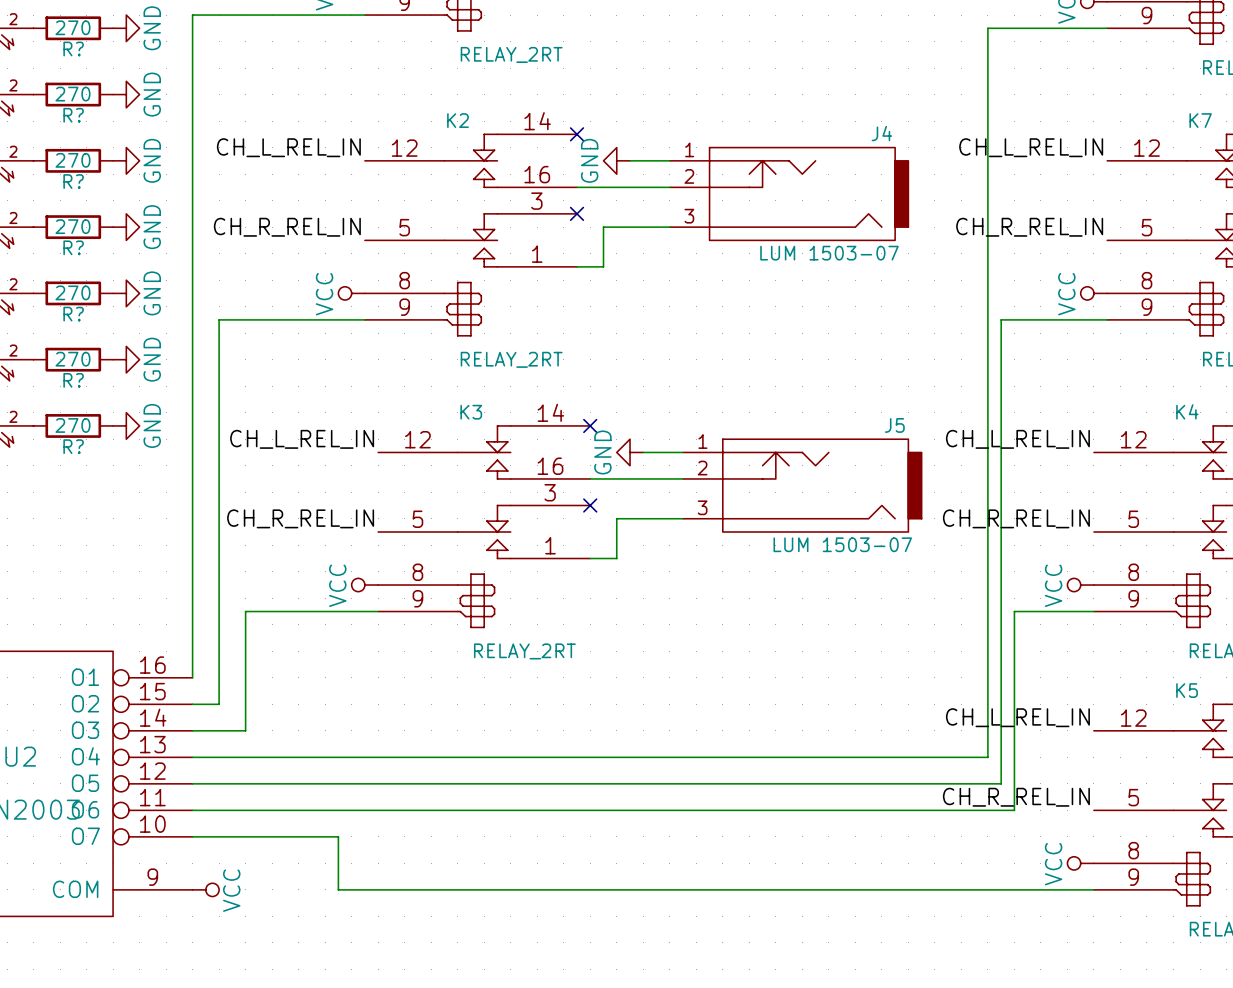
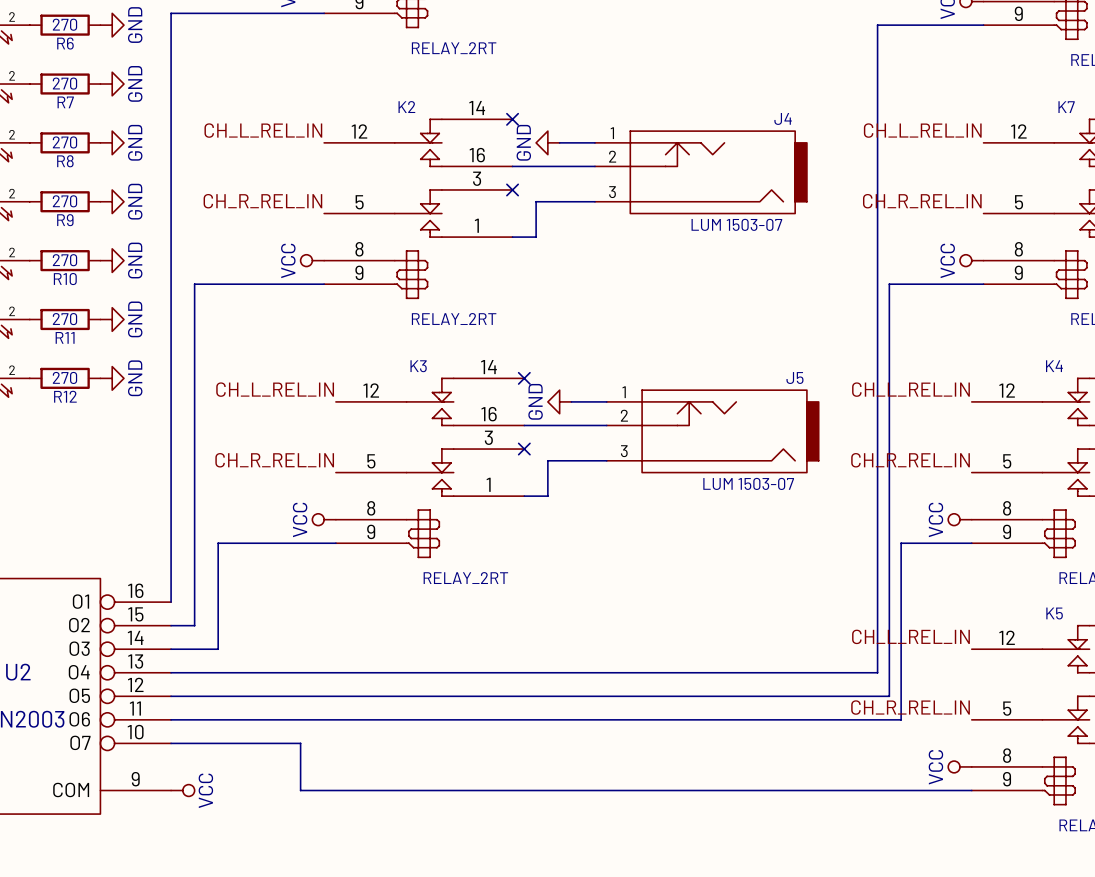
R? name: R? (73, 49) -> R6 (65, 43)
R? name: R? (73, 115) -> R7 (65, 102)
R? name: R? (73, 181) -> R8 (65, 161)
R? name: R? (73, 247) -> R9 (65, 220)
R? name: R? (73, 314) -> R10 (65, 279)
R? name: R? (73, 380) -> R11 (65, 337)
R? name: R? (73, 446) -> R12 (65, 396)

